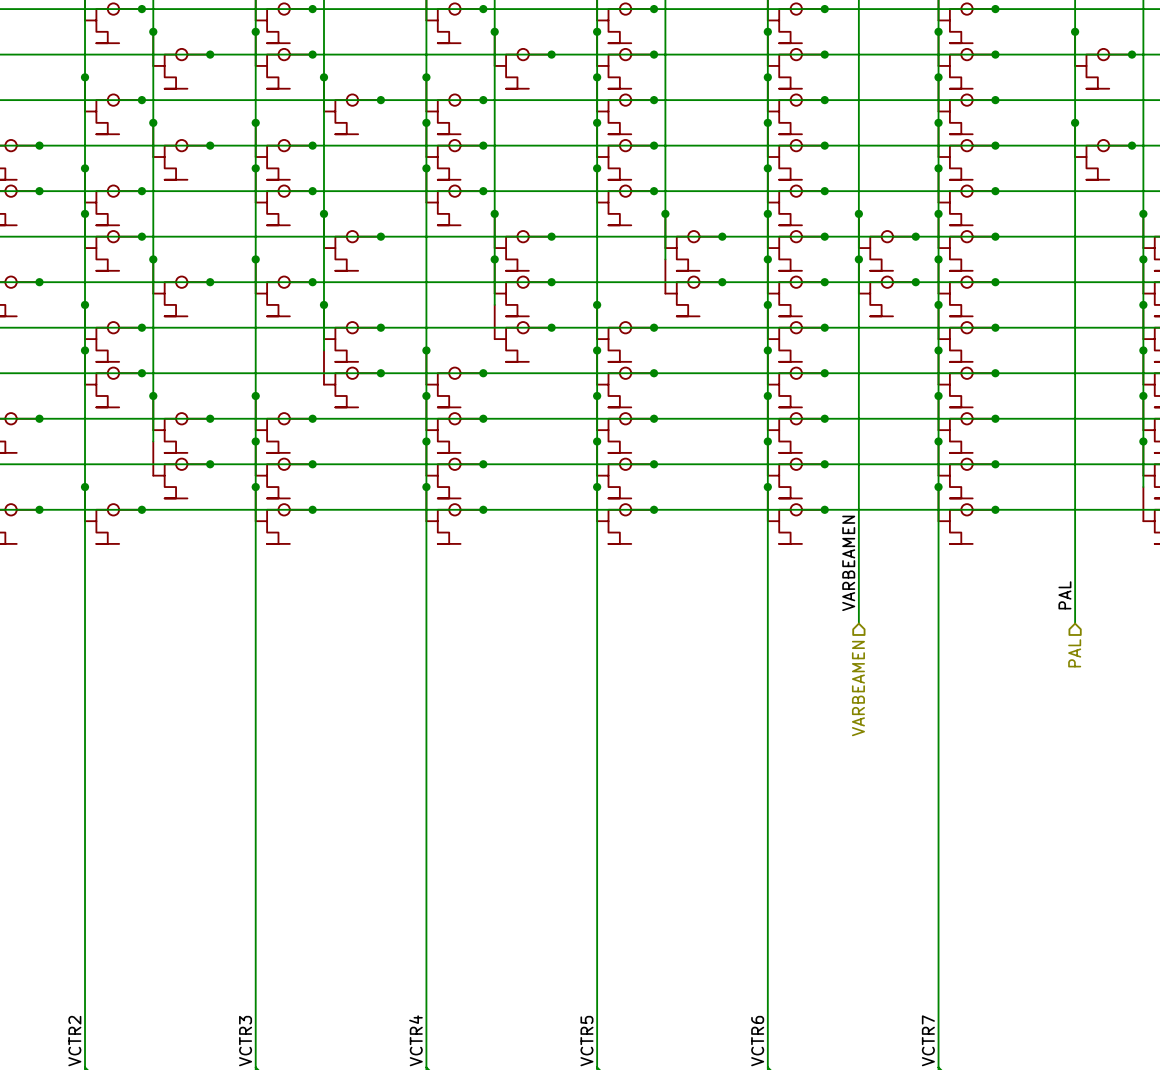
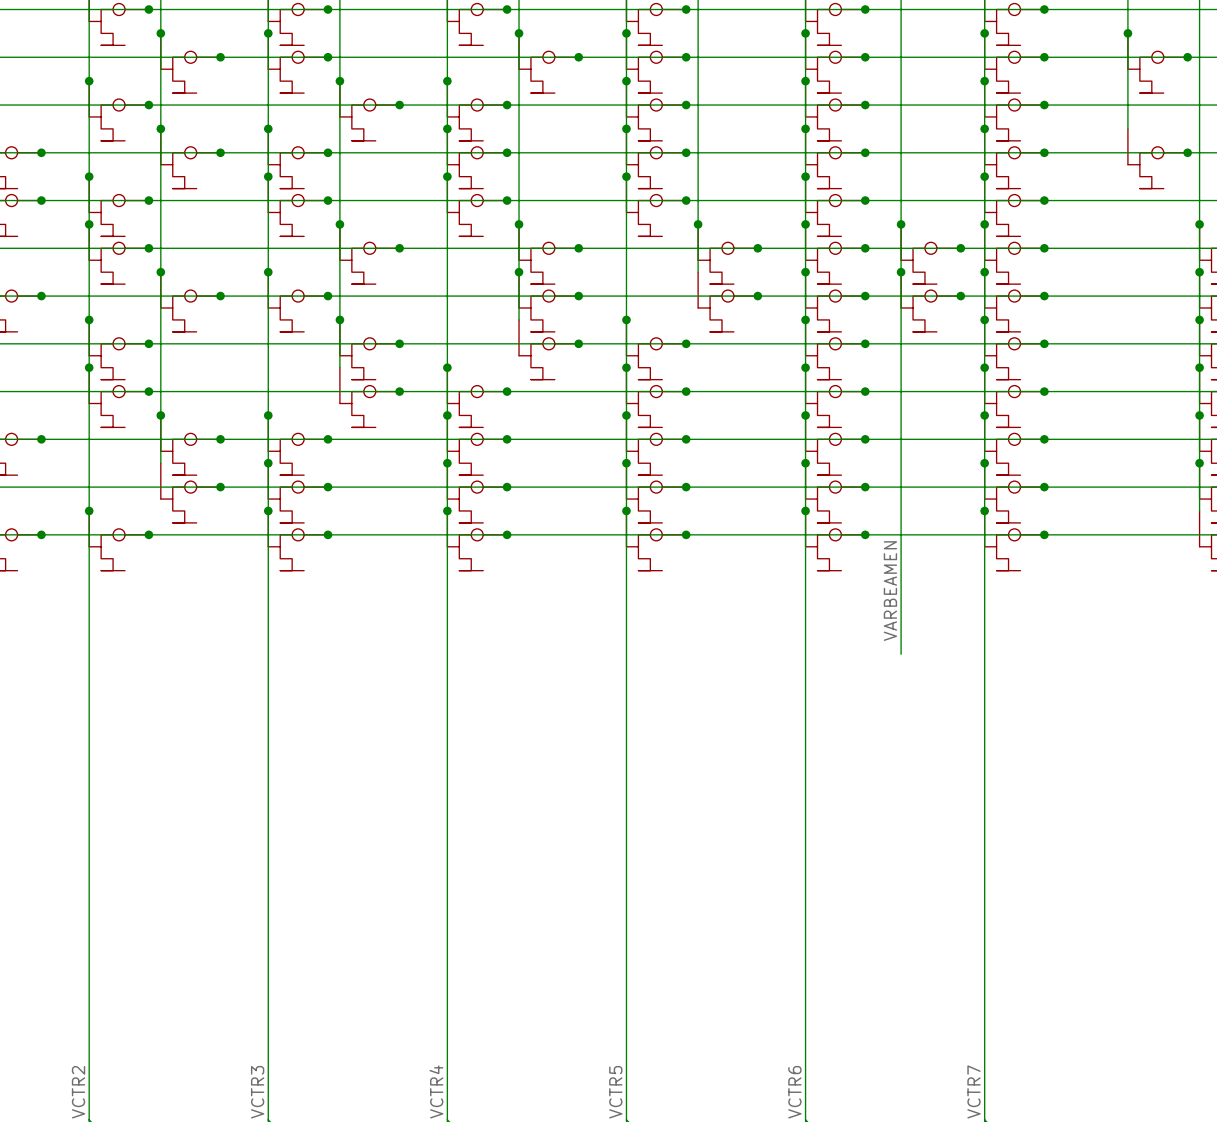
wire: (1075, 122) (1075, 623) -> none
junction: (1075, 122) -> none
label: PAL (1064, 595) -> none
hierarchical label: PAL (1074, 653) -> none
hierarchical label: VARBEAMEN (858, 688) -> none

